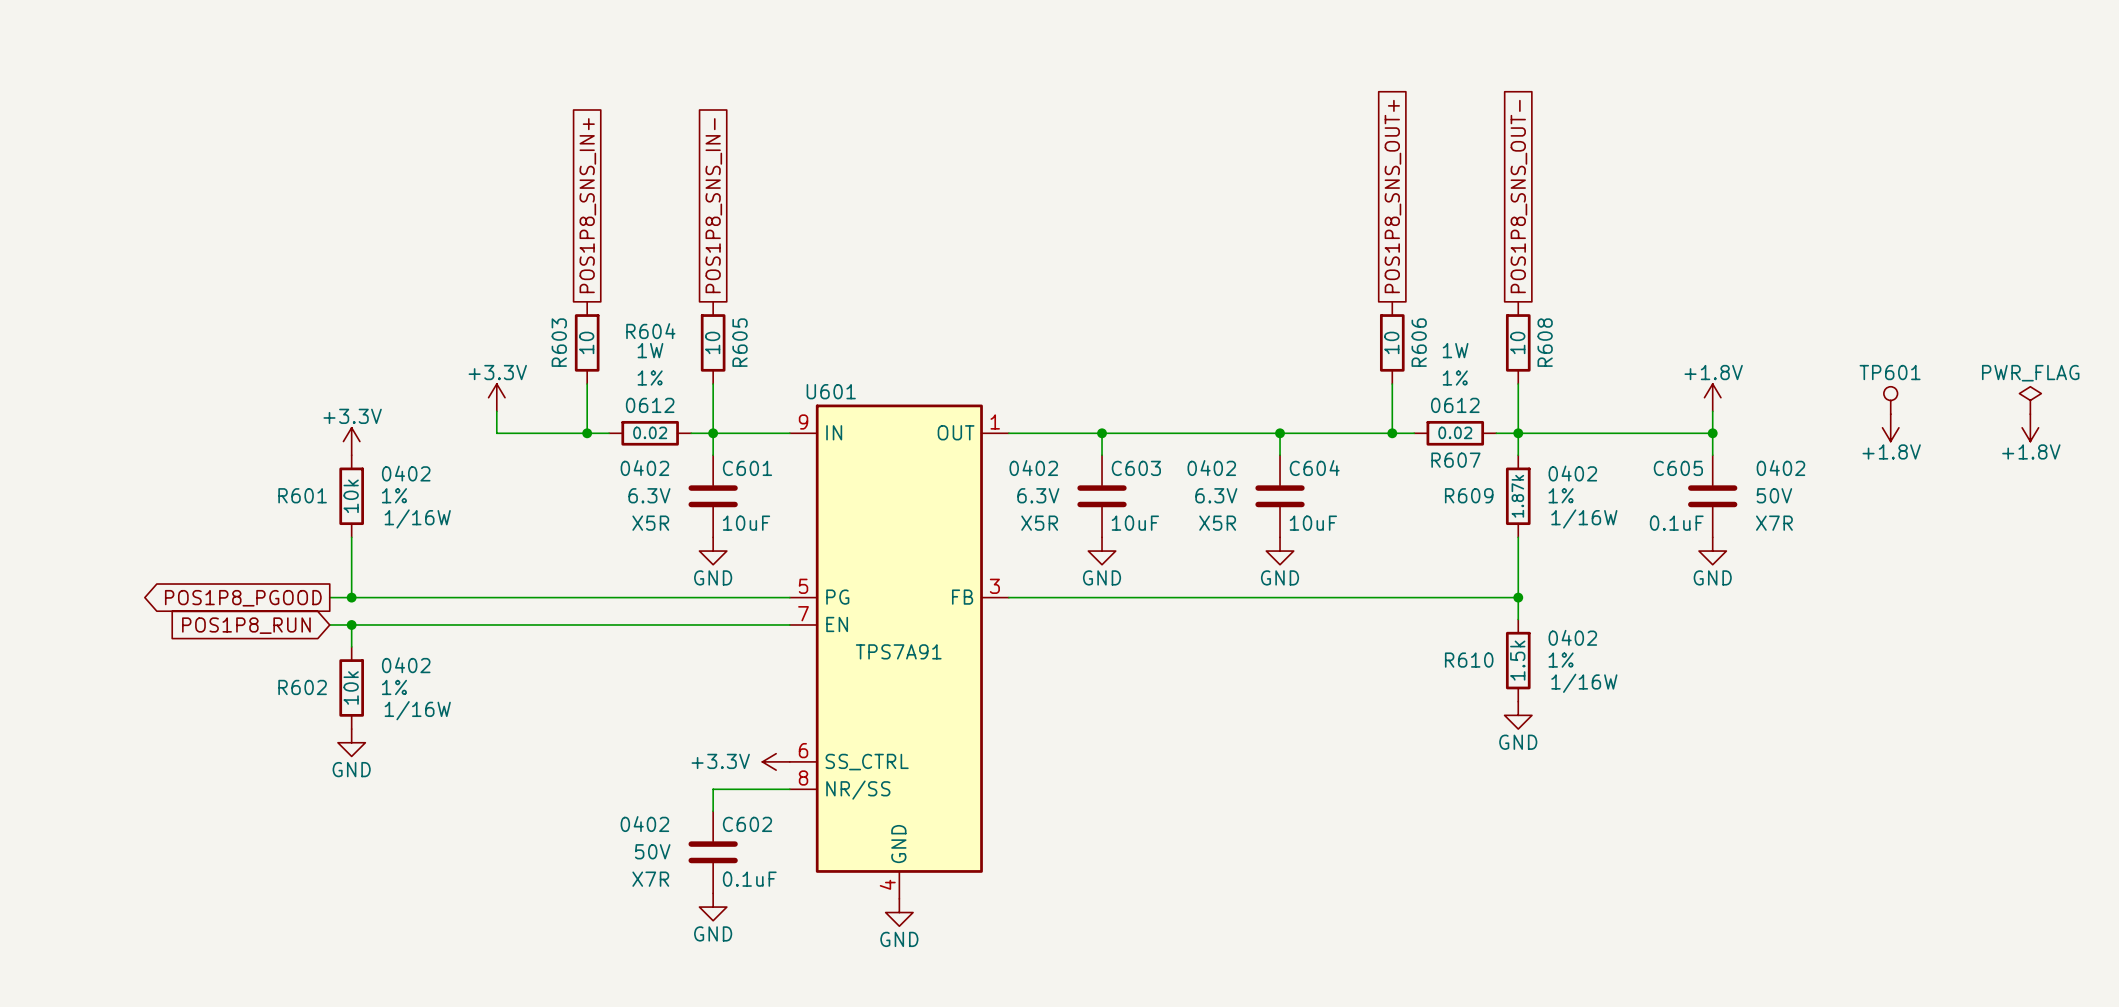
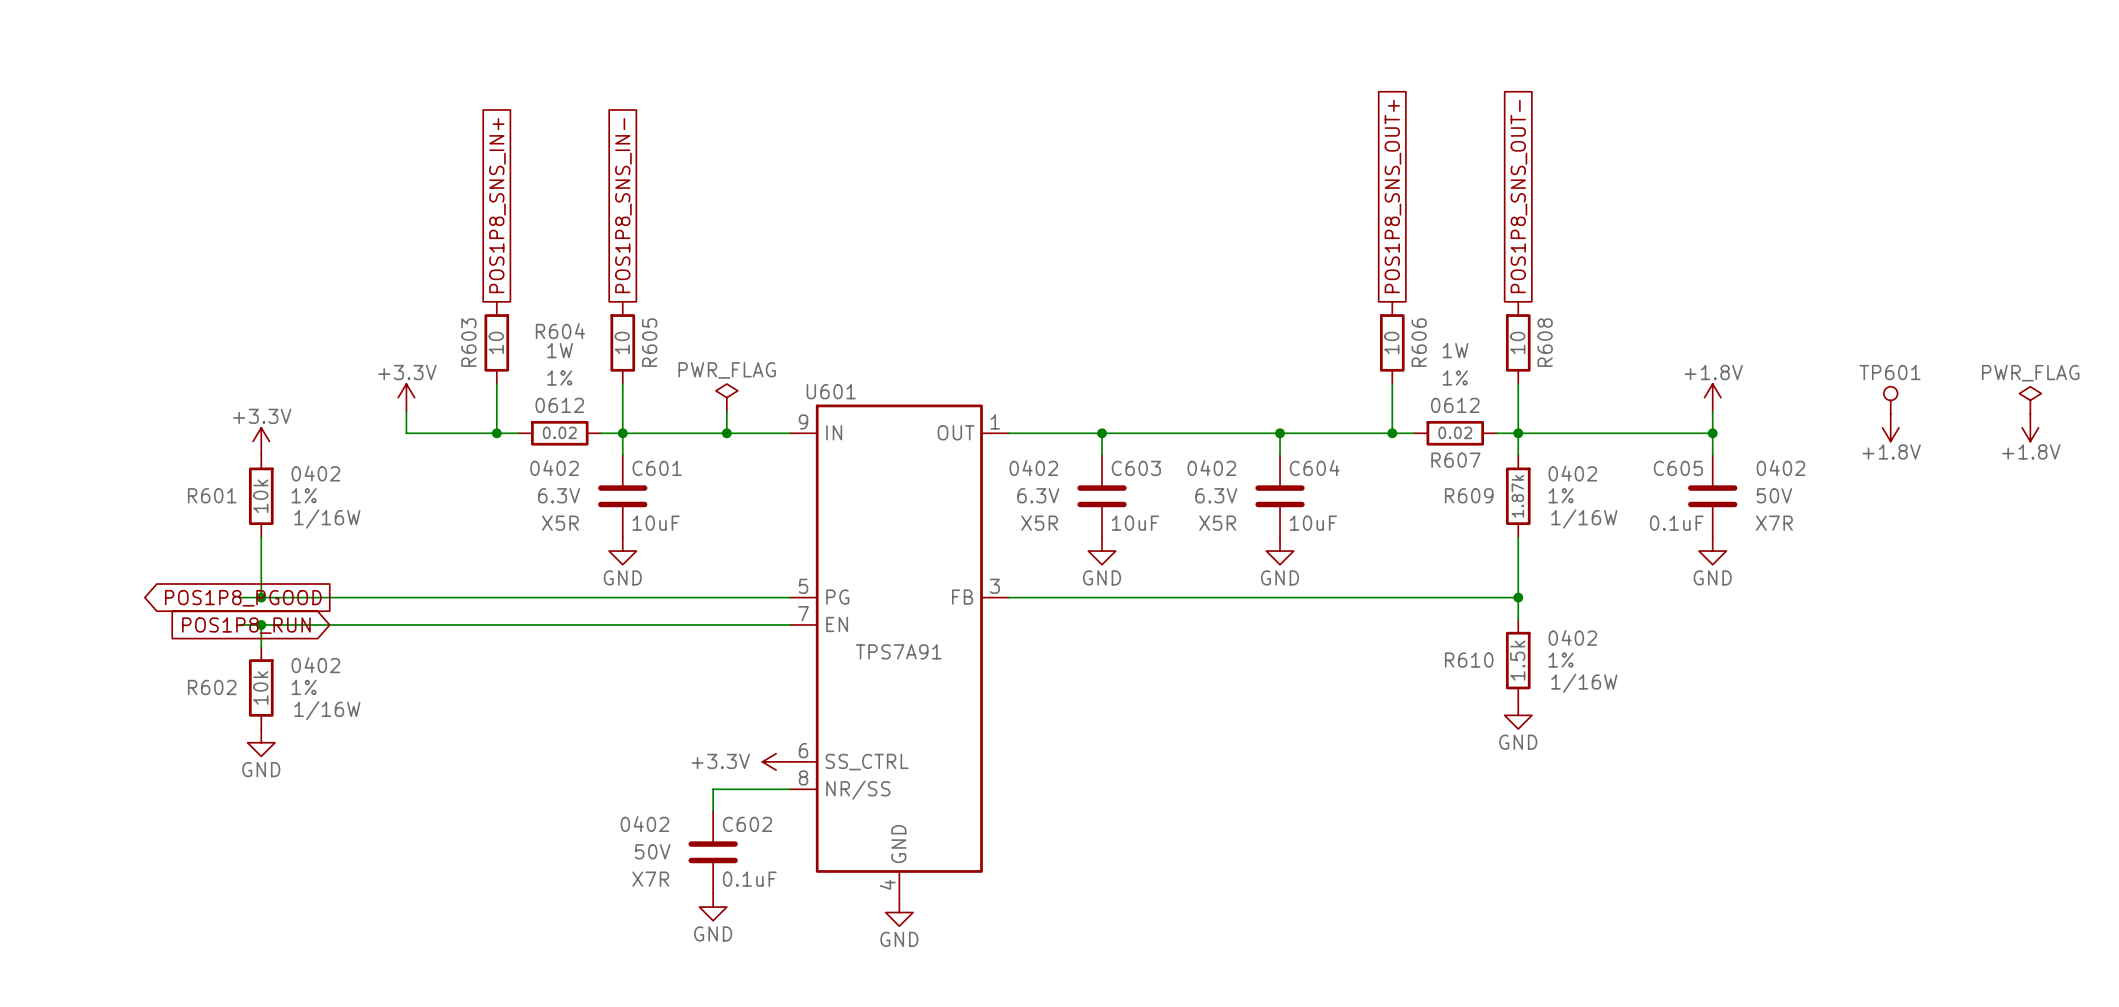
global label position: POS1P8_SNS_IN+ (587, 205) -> POS1P8_SNS_IN+ (497, 205)
global label position: POS1P8_SNS_IN- (713, 205) -> POS1P8_SNS_IN- (623, 205)
R603 position: (587, 342) -> (496, 342)
R605 position: (713, 342) -> (622, 342)
wire: (587, 384) (587, 433) -> none
wire: (713, 384) (713, 455) -> (622, 384) (622, 455)
power symbol: none -> +3.3V (406, 397)
power symbol: +3.3V (496, 397) -> none
power symbol: none -> PWR_FLAG (726, 397)
wire: none -> (406, 411) (406, 433) (496, 433)
wire: none -> (726, 411) (726, 433)
junction: none -> (496, 433)
wire: (518, 433) (600, 433) -> (609, 433) (691, 433)
junction position: (587, 433) -> (622, 433)
R604 position: (650, 433) -> (559, 433)
junction position: (713, 433) -> (726, 433)
power symbol: none -> +3.3V (261, 441)
power symbol: +3.3V (351, 441) -> none
R601 position: (351, 496) -> (261, 496)
C601 position: (713, 496) -> (622, 496)
wire: (351, 537) (351, 597) -> (261, 537) (261, 597)
power symbol position: GND (713, 551) -> GND (622, 551)
wire: none -> (239, 597) (329, 597)
junction: none -> (261, 597)
junction: (351, 597) -> none
wire: none -> (239, 624) (329, 624)
junction: none -> (261, 624)
wire: (351, 624) (351, 646) -> (261, 624) (261, 646)
junction: (351, 624) -> none
R602 position: (351, 687) -> (261, 687)
power symbol position: GND (351, 742) -> GND (261, 742)

